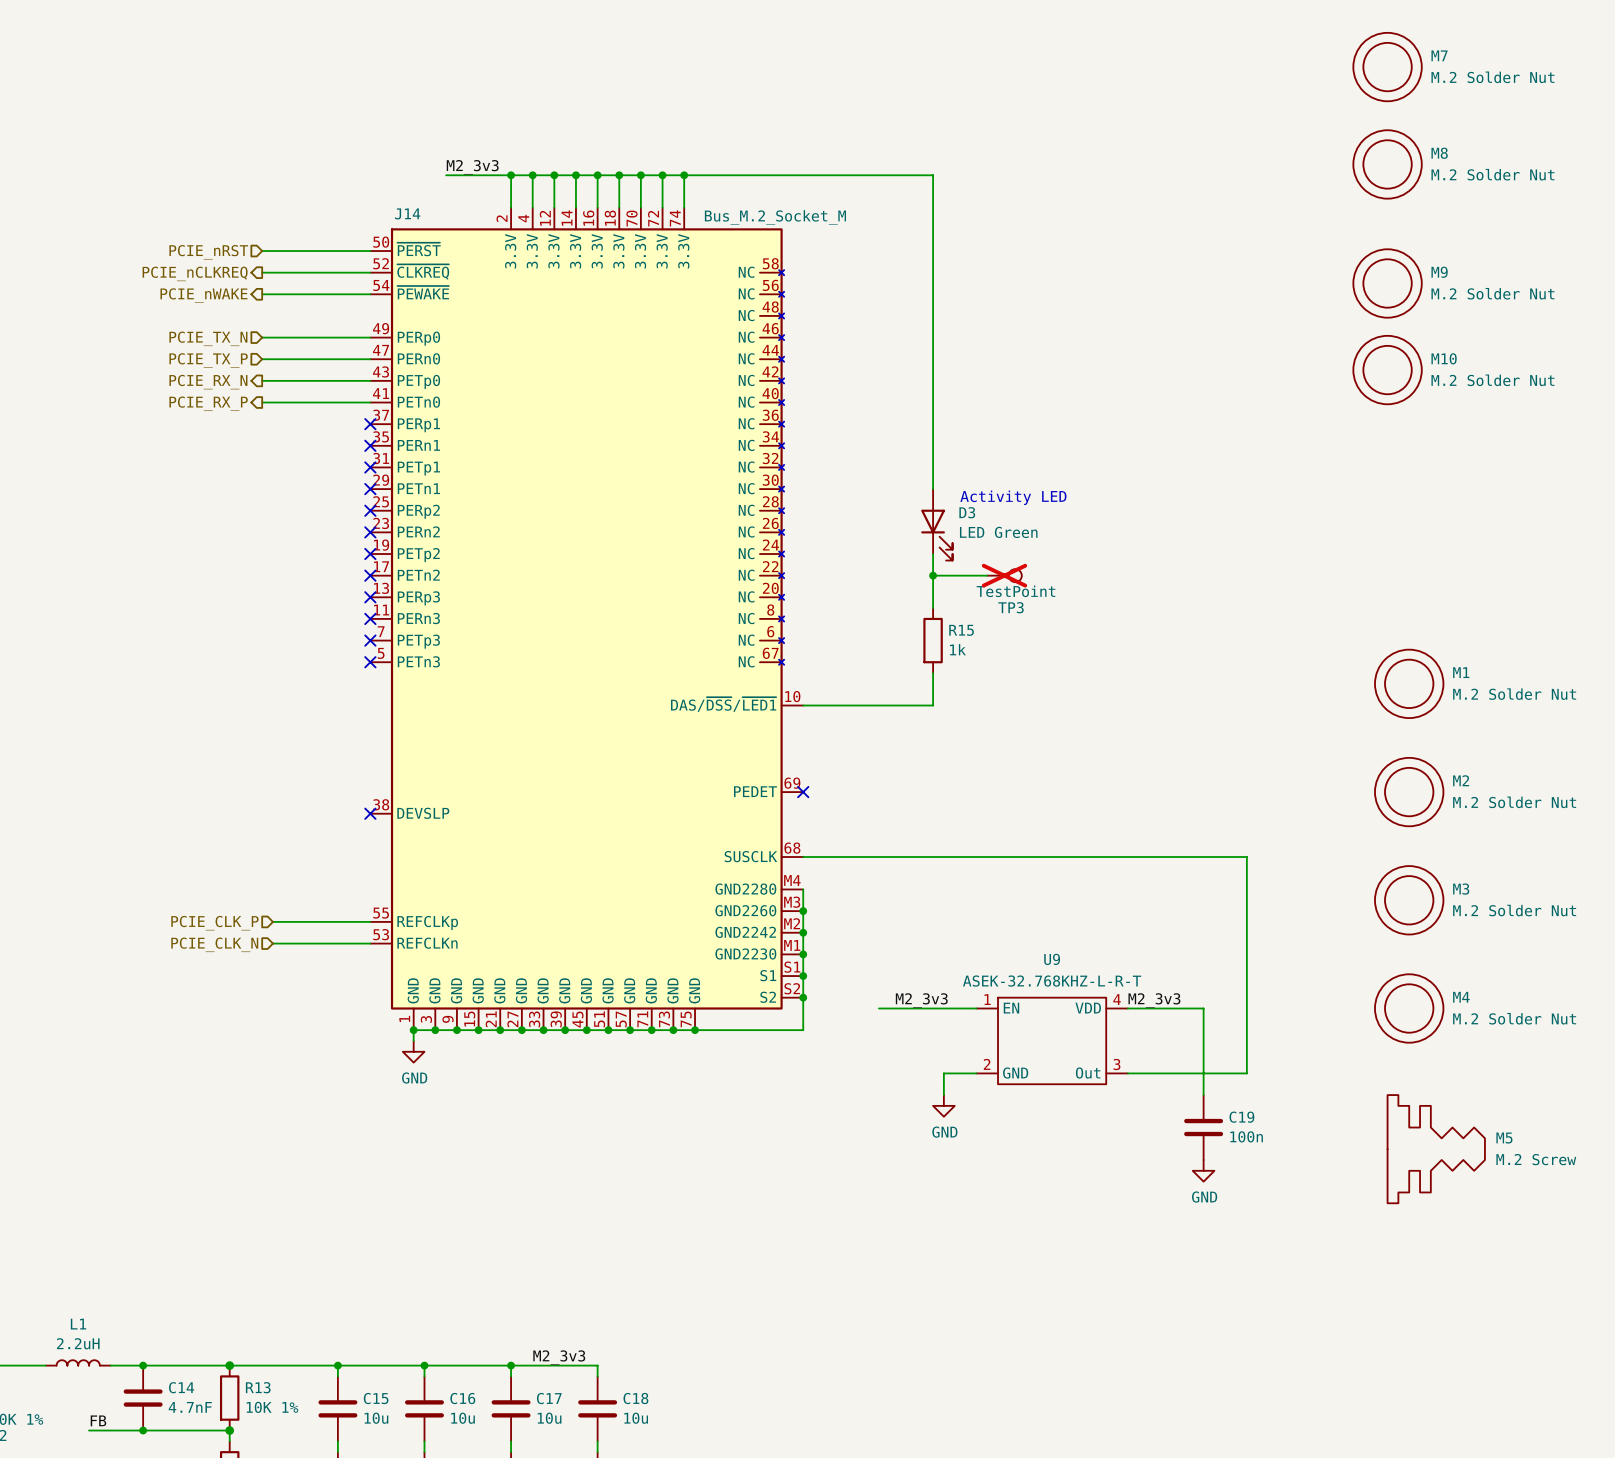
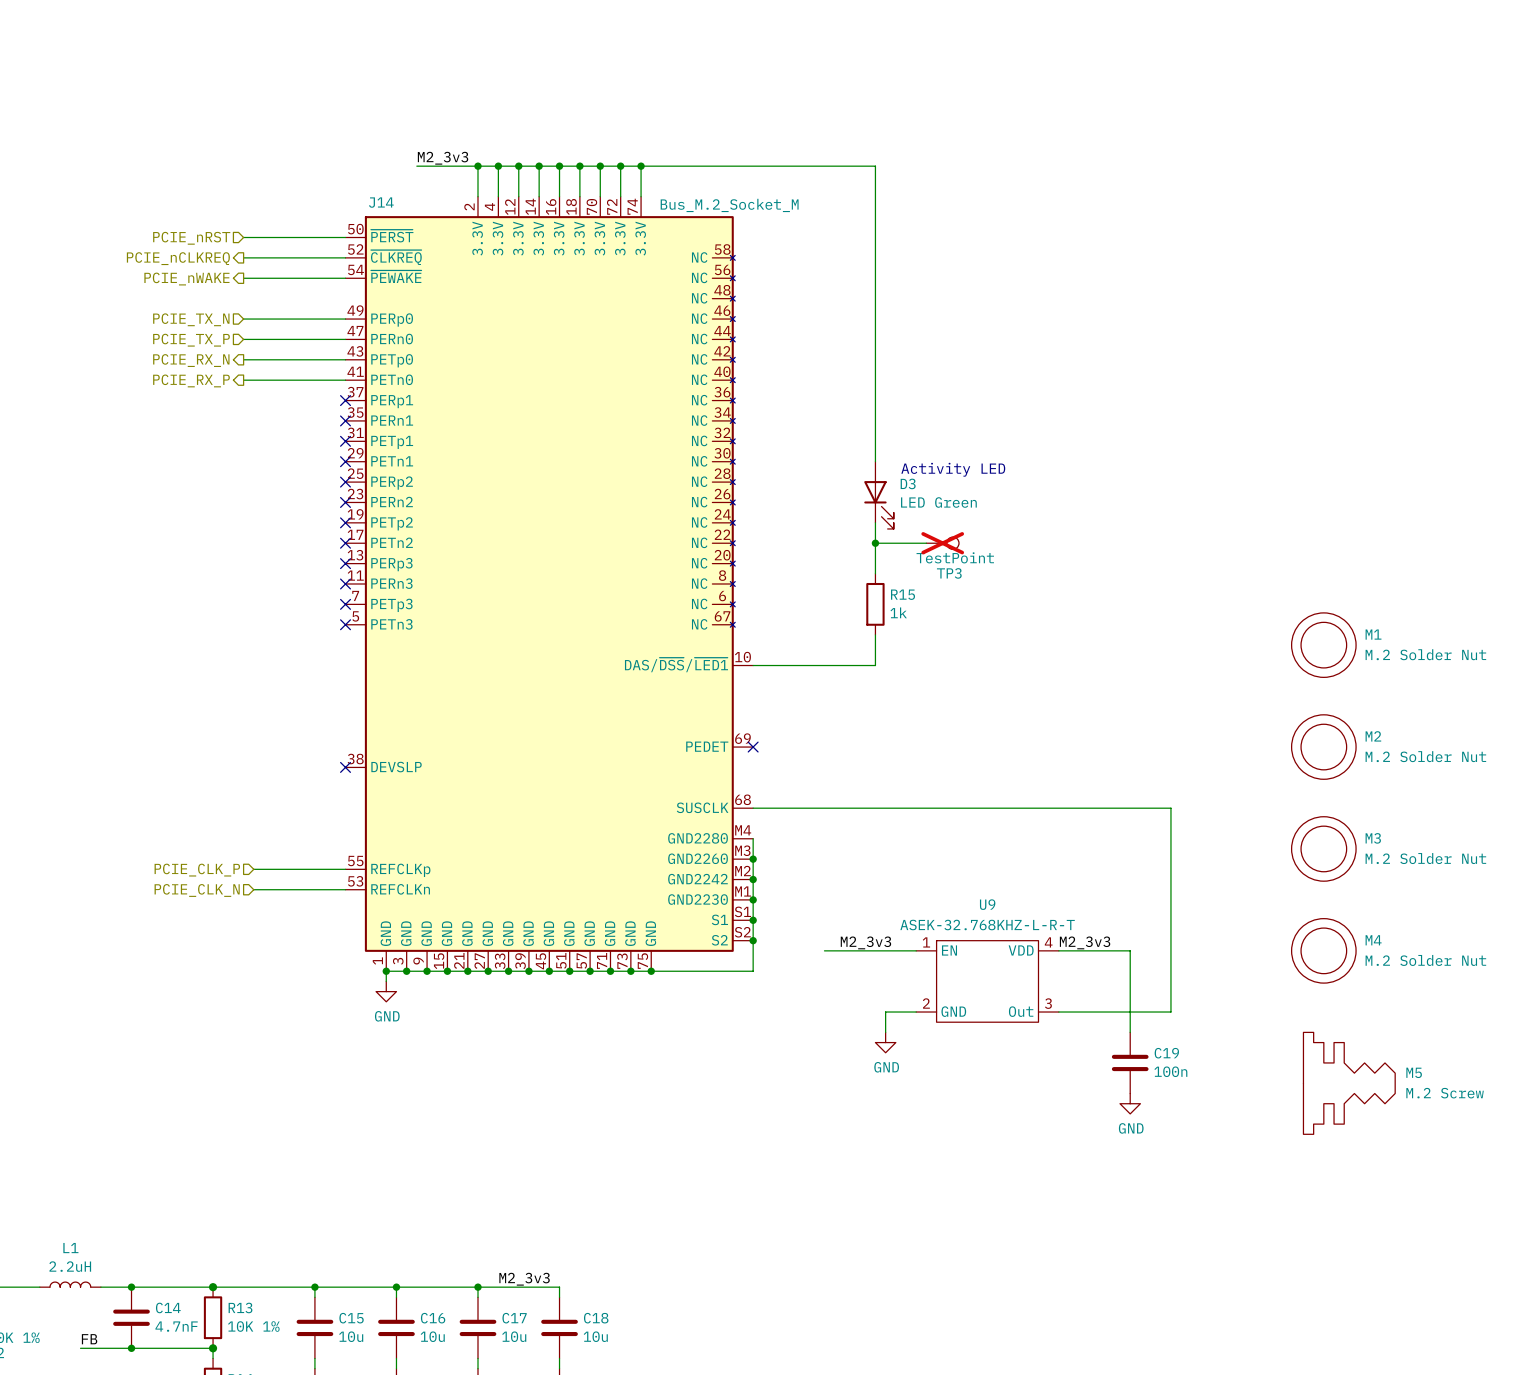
M7: M.2 Solder Nut (1387, 67) -> none
M8: M.2 Solder Nut (1387, 164) -> none
M9: M.2 Solder Nut (1387, 283) -> none
M10: M.2 Solder Nut (1387, 370) -> none

